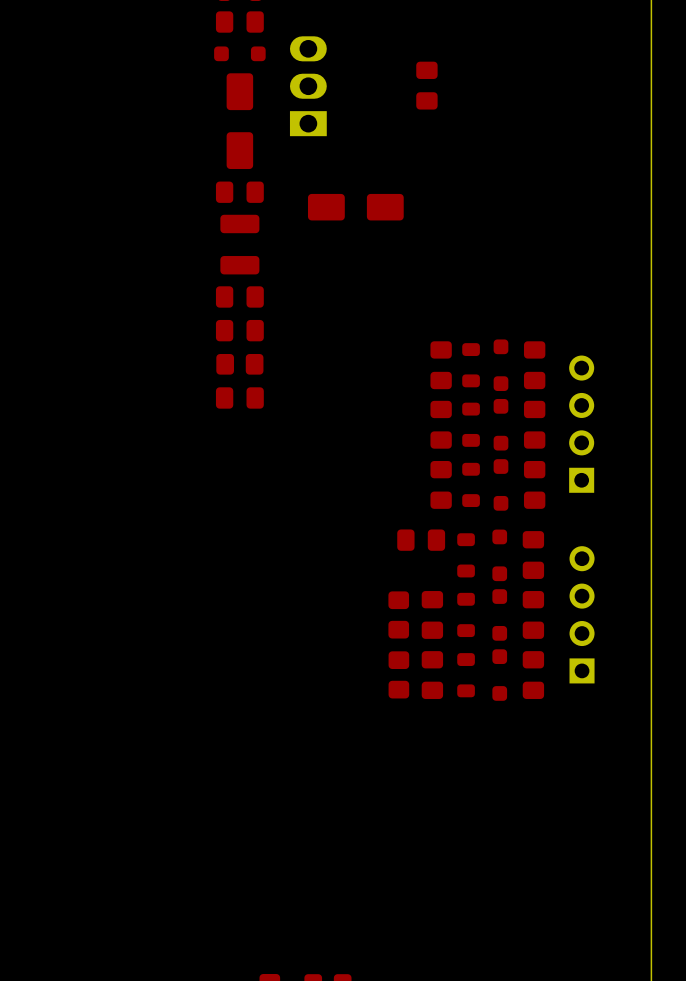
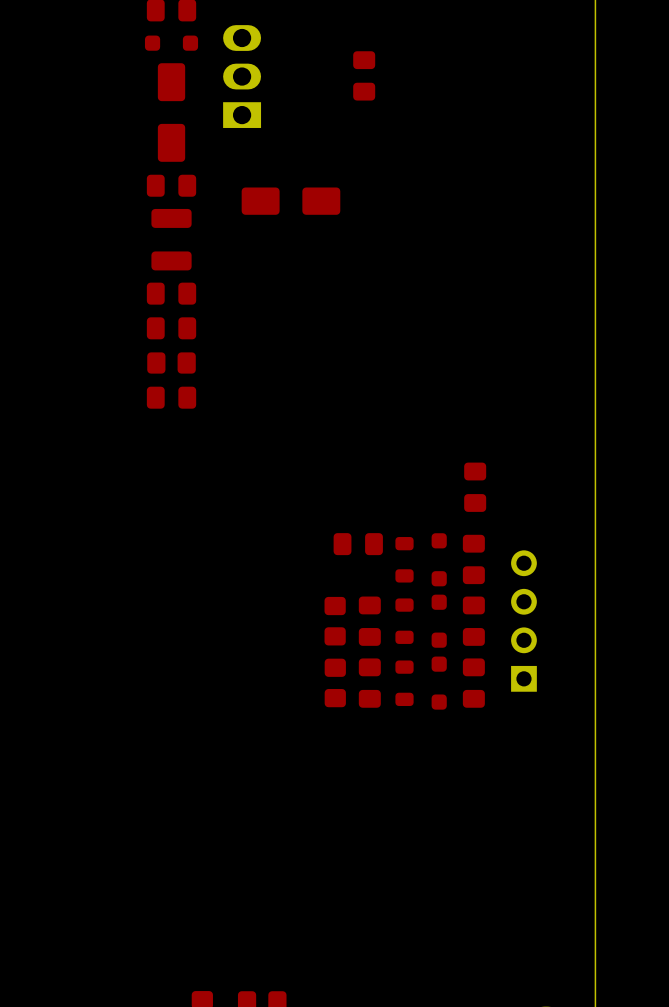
part: (441, 365) -> none
part: (471, 365) -> none
part: (500, 365) -> none
part: (534, 365) -> none
part: (441, 424) -> none
part: (471, 424) -> none
part: (500, 424) -> none
part: (534, 424) -> none
part: (581, 424) -> none
part: (441, 484) -> none
part: (471, 484) -> none
part: (500, 484) -> none

